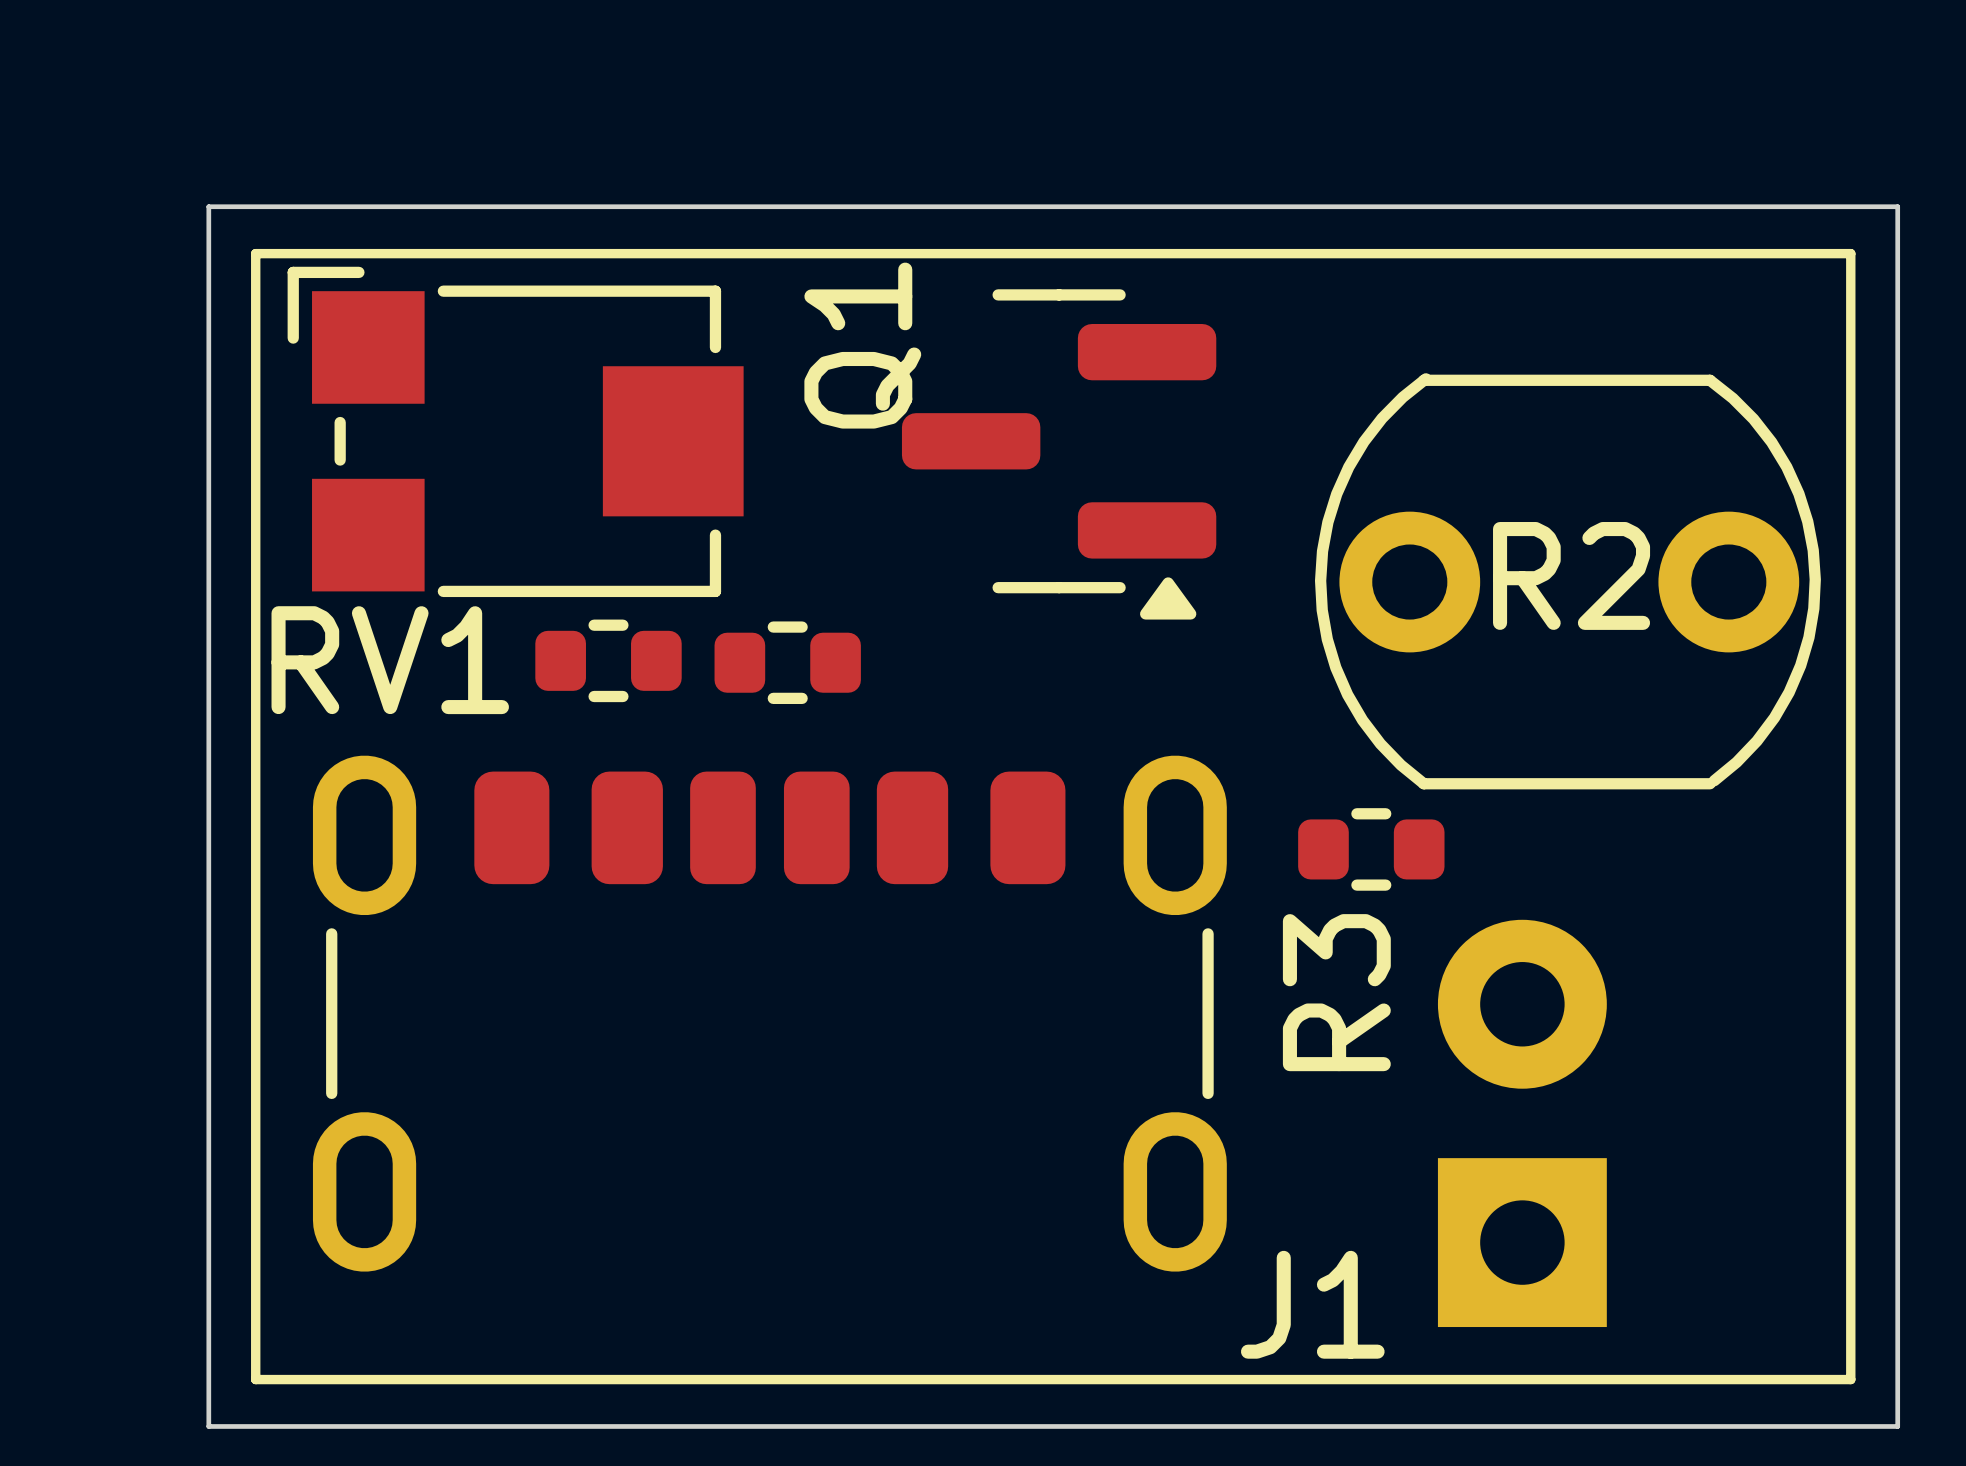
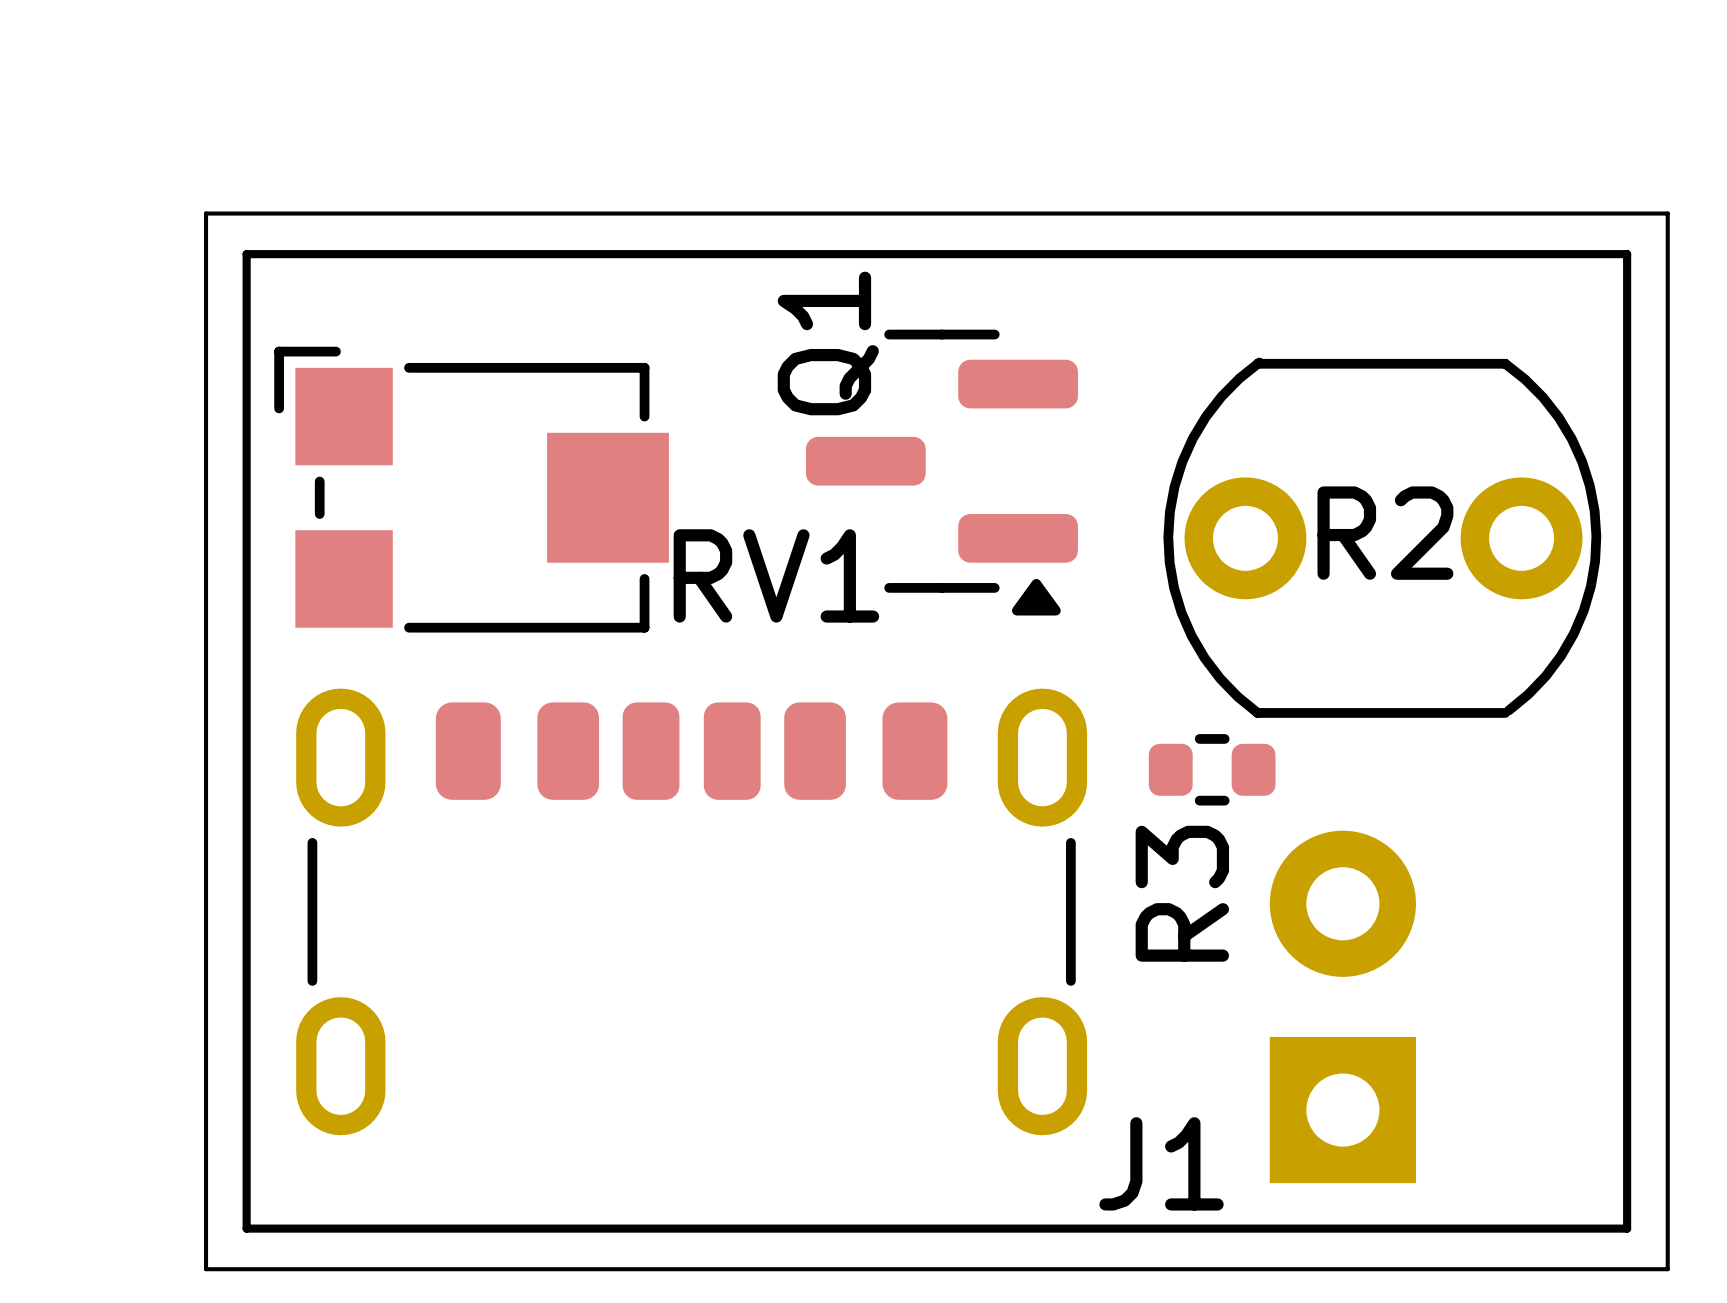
Q1 name position: Q1 (862, 345) -> Q1 (828, 343)
RV1 position: (515, 431) -> (471, 489)
Q1 position: (1059, 454) -> (941, 472)
RV1 name position: RV1 (390, 660) -> RV1 (776, 575)
part: (608, 660) -> none
part: (787, 662) -> none

